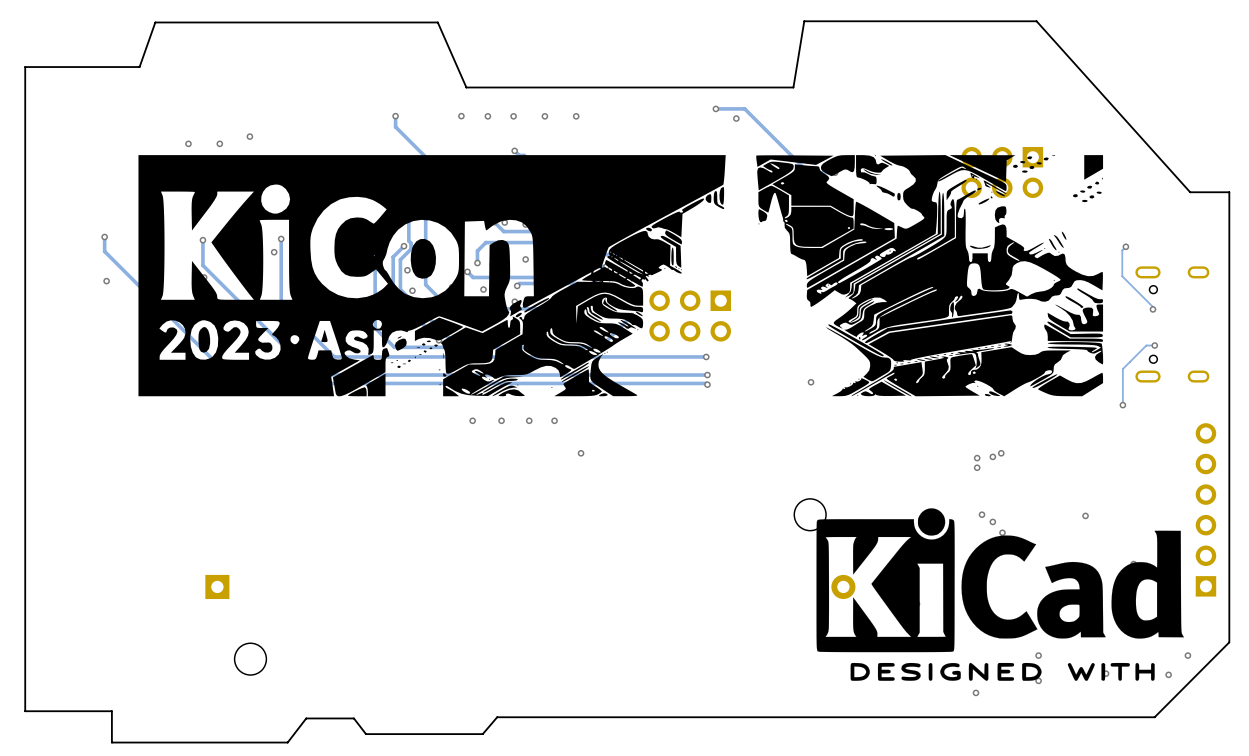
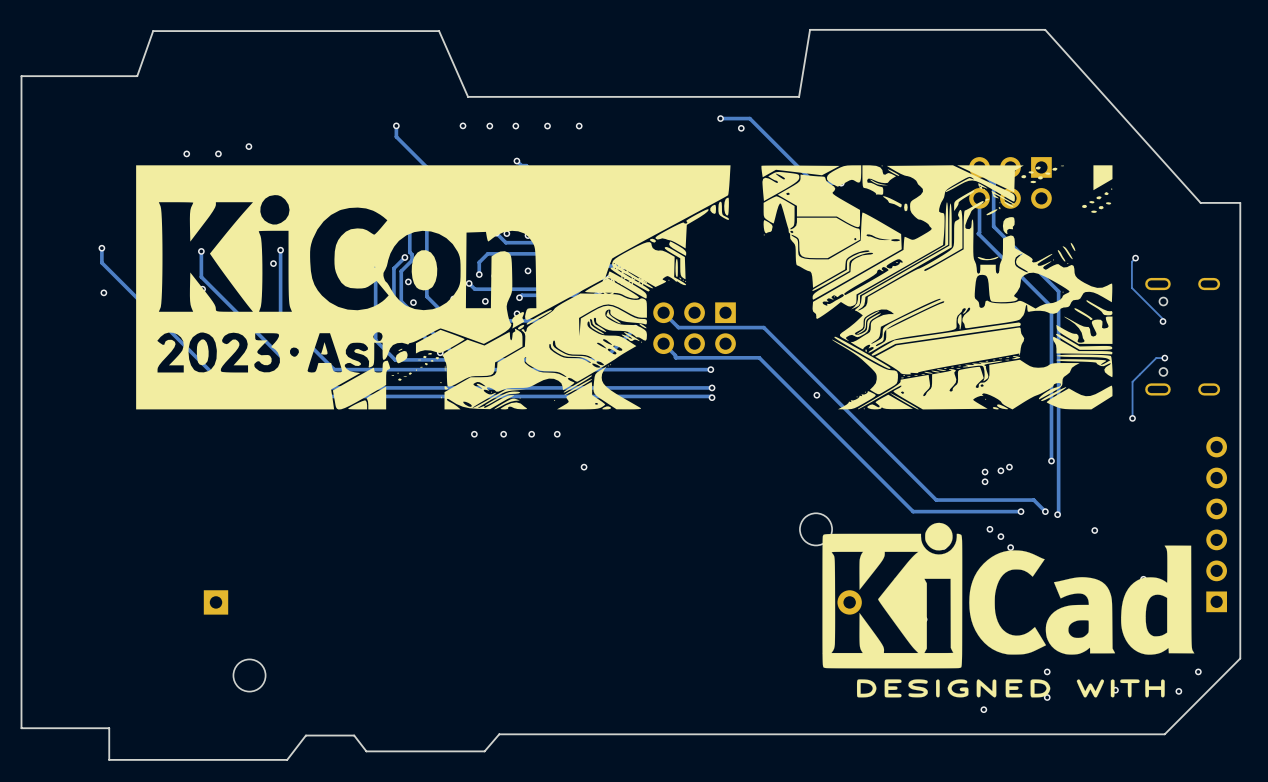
track: none -> (979, 167) (994, 184) (993, 226) (1058, 291) (1057, 514)
track: none -> (979, 198) (978, 233) (1051, 306) (1051, 461)
track: none -> (663, 312) (678, 327) (763, 327) (936, 500) (1033, 500) (1045, 511)
track: none -> (663, 343) (675, 357) (759, 357) (913, 511) (1021, 511)
via: none -> (1051, 461)
via: none -> (1021, 511)
via: none -> (1045, 511)
via: none -> (1057, 514)

